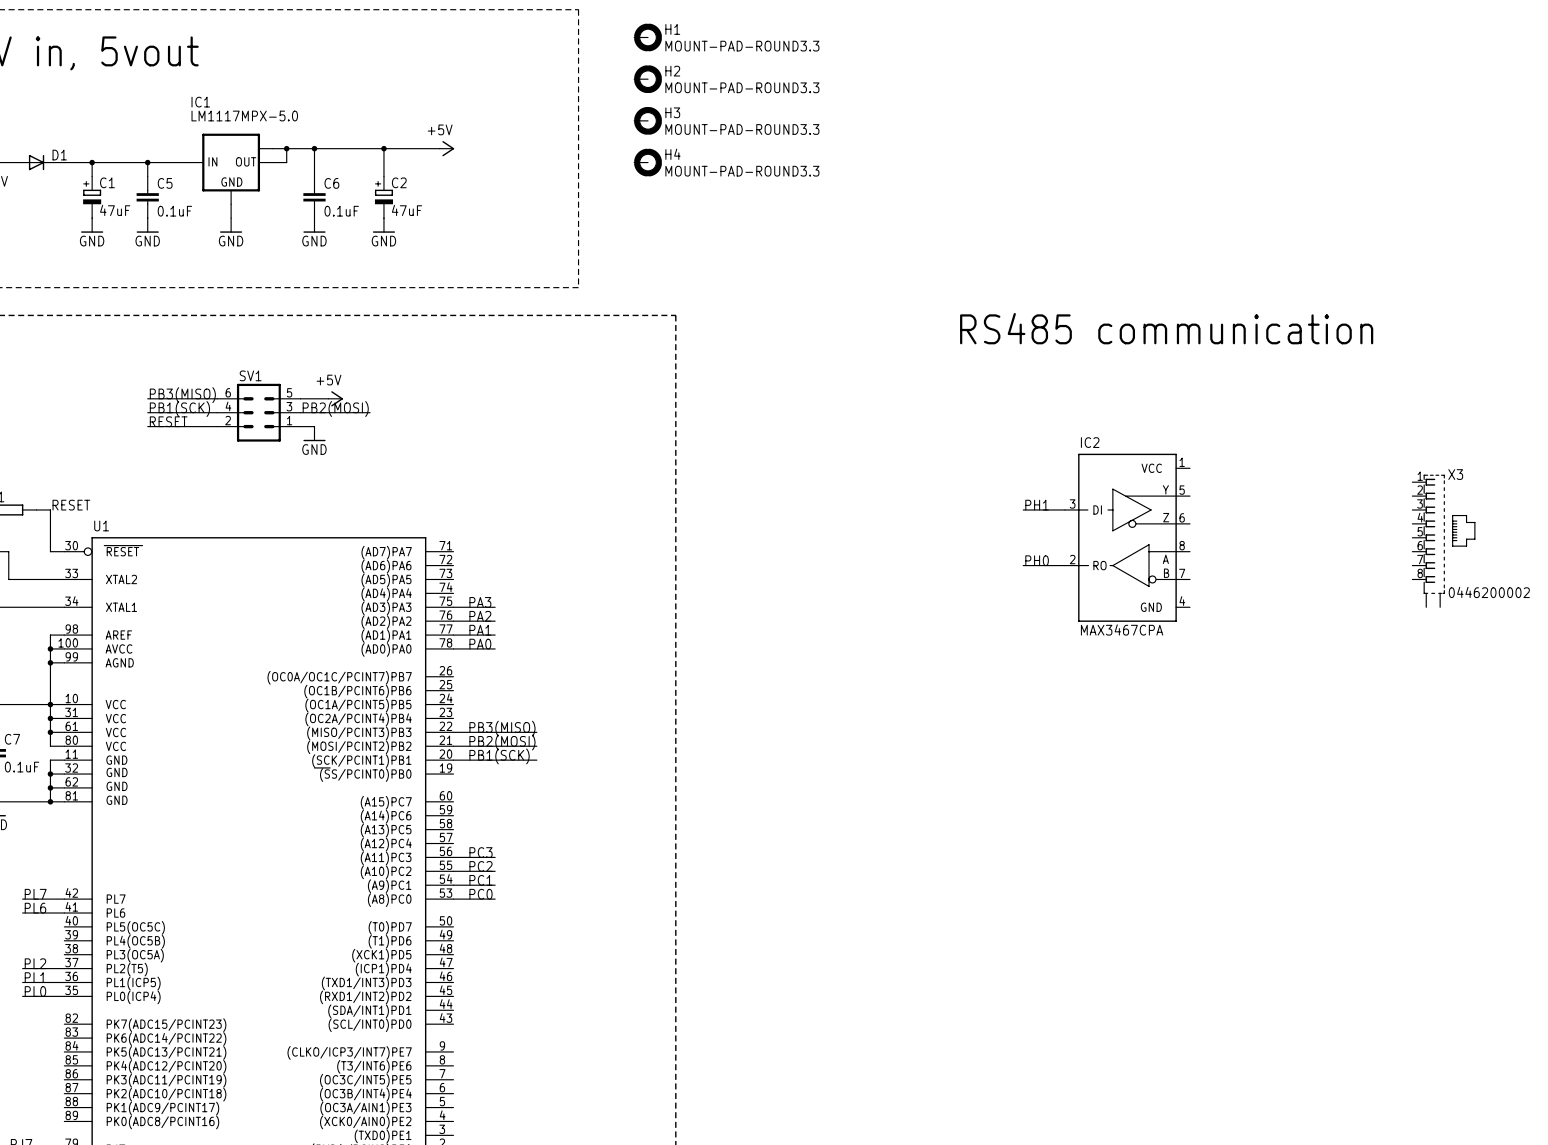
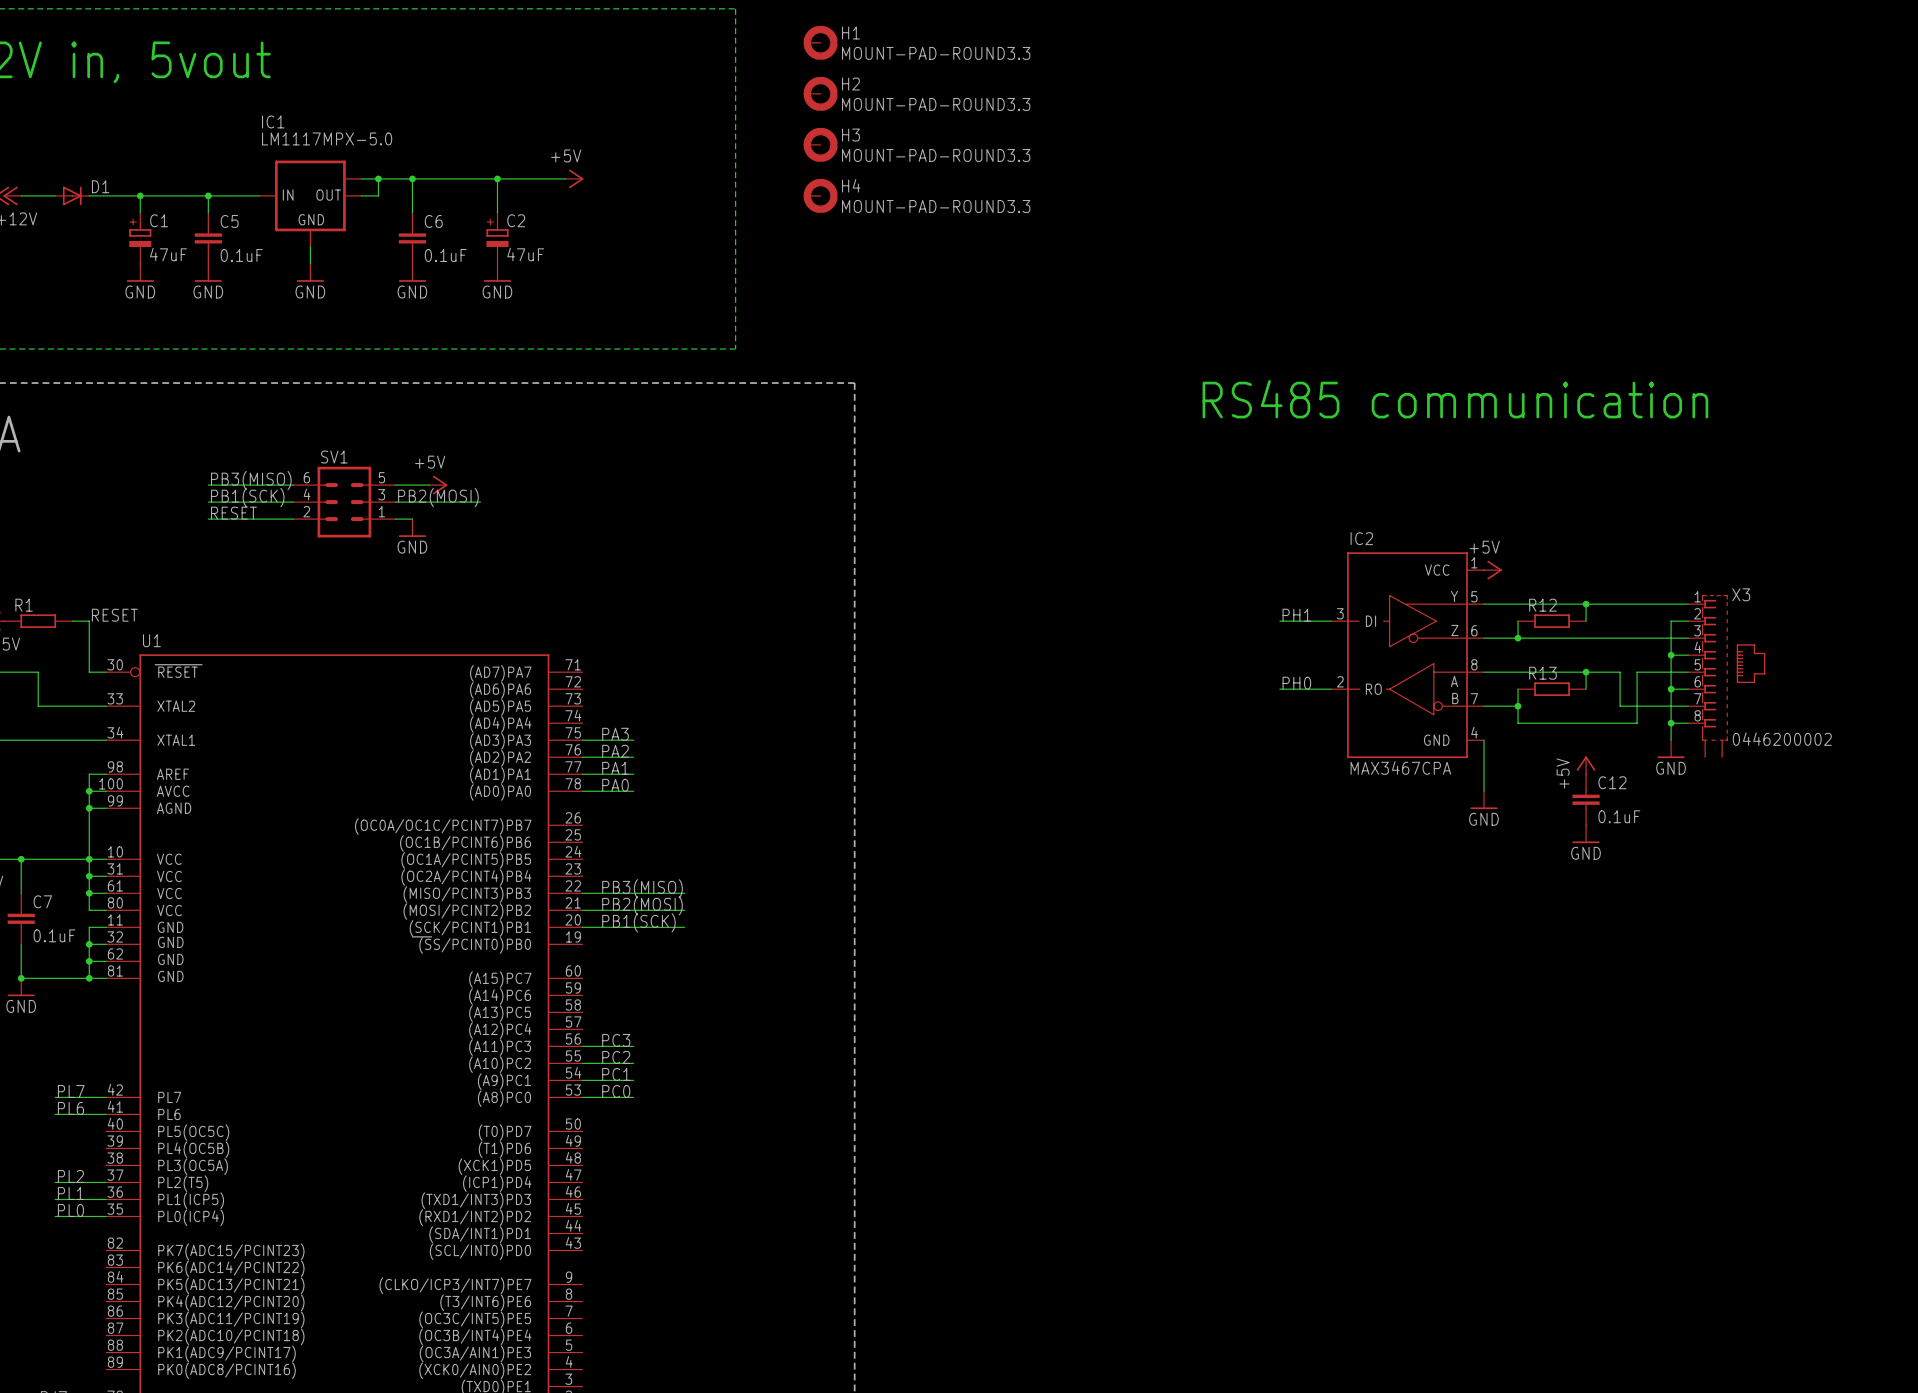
power symbol: none -> +5V (1492, 570)
wire: none -> (1484, 604) (1688, 604)
wire: none -> (1586, 604) (1586, 621)
junction: none -> (1586, 604)
wire: none -> (1518, 621) (1518, 638)
R12: none -> (1552, 621)
wire: none -> (1688, 621) (1671, 621) (1671, 740)
wire: none -> (1484, 638) (1688, 638)
junction: none -> (1518, 638)
wire: none -> (1671, 655) (1688, 655)
junction: none -> (1671, 655)
X3 position: (1443, 541) -> (1726, 676)
wire: none -> (1484, 672) (1620, 672) (1620, 706) (1688, 706)
wire: none -> (1586, 672) (1586, 689)
junction: none -> (1586, 672)
wire: none -> (1688, 672) (1637, 672) (1637, 723) (1518, 723) (1518, 689)
R13: none -> (1552, 689)
wire: none -> (1671, 689) (1688, 689)
junction: none -> (1671, 689)
wire: none -> (1484, 706) (1518, 706)
junction: none -> (1518, 706)
wire: none -> (1671, 723) (1688, 723)
junction: none -> (1671, 723)
wire: none -> (1484, 740) (1484, 791)
power symbol: none -> GND (1671, 749)
power symbol: none -> +5V (1586, 765)
C12: none -> 0.1uF (1586, 799)
power symbol: none -> GND (1484, 800)
power symbol: none -> GND (1586, 834)

